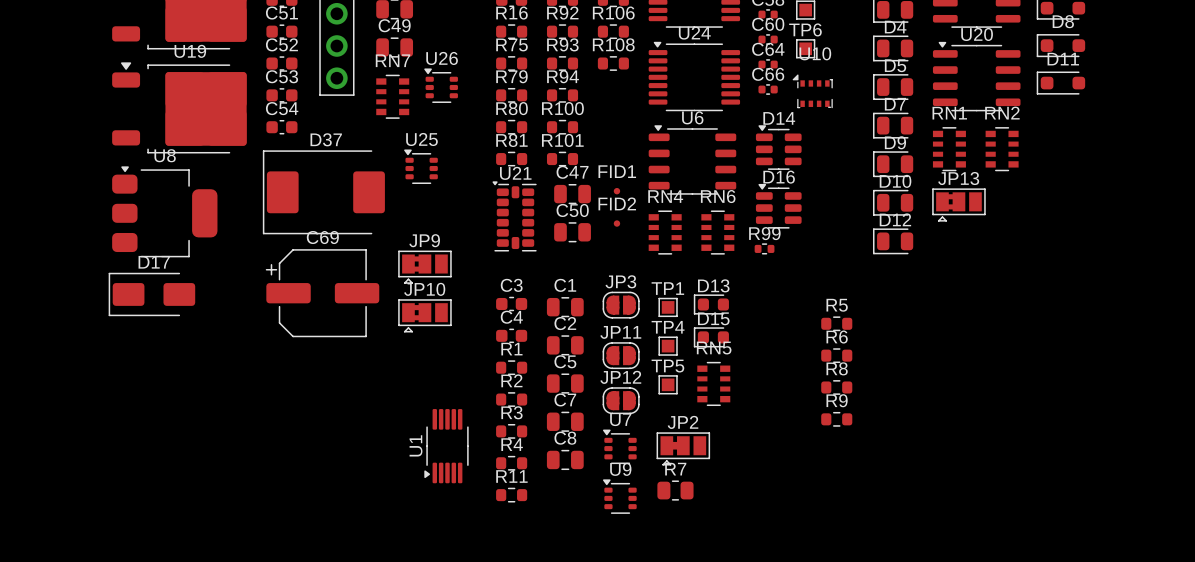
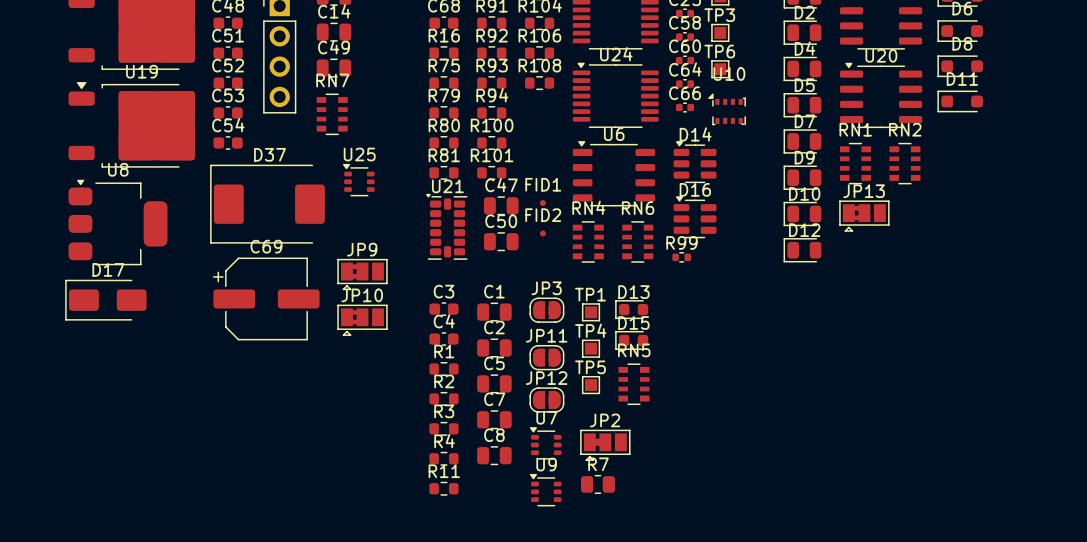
U26: (441, 85) -> none
R5: (836, 323) -> none
R6: (836, 355) -> none
R8: (836, 387) -> none
R9: (836, 419) -> none
U1: (446, 446) -> none

